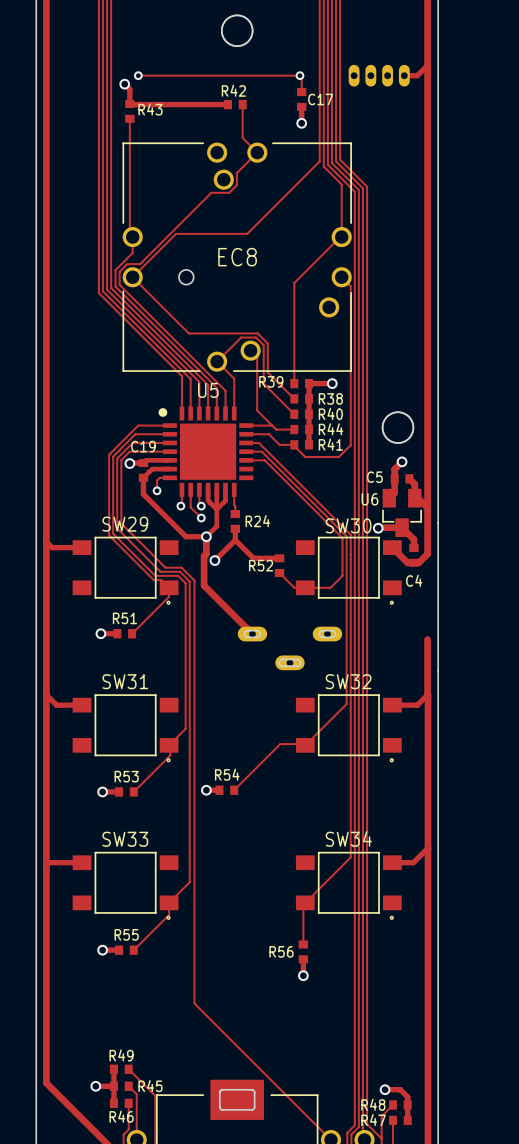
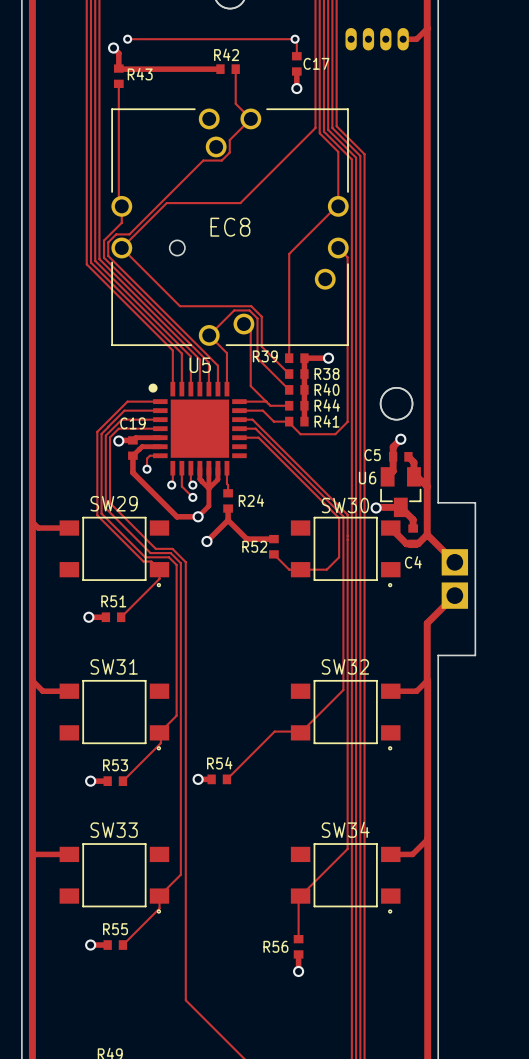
board edge: (438, 523) (438, 670) -> (438, 502) (475, 502) (475, 655) (438, 655)
track: (206, 536) (204, 585) (252, 634) -> none
track: none -> (427, 534) (454, 562)
part: none -> (454, 578)
track: none -> (454, 595) (427, 623)
part: (289, 648) -> none

